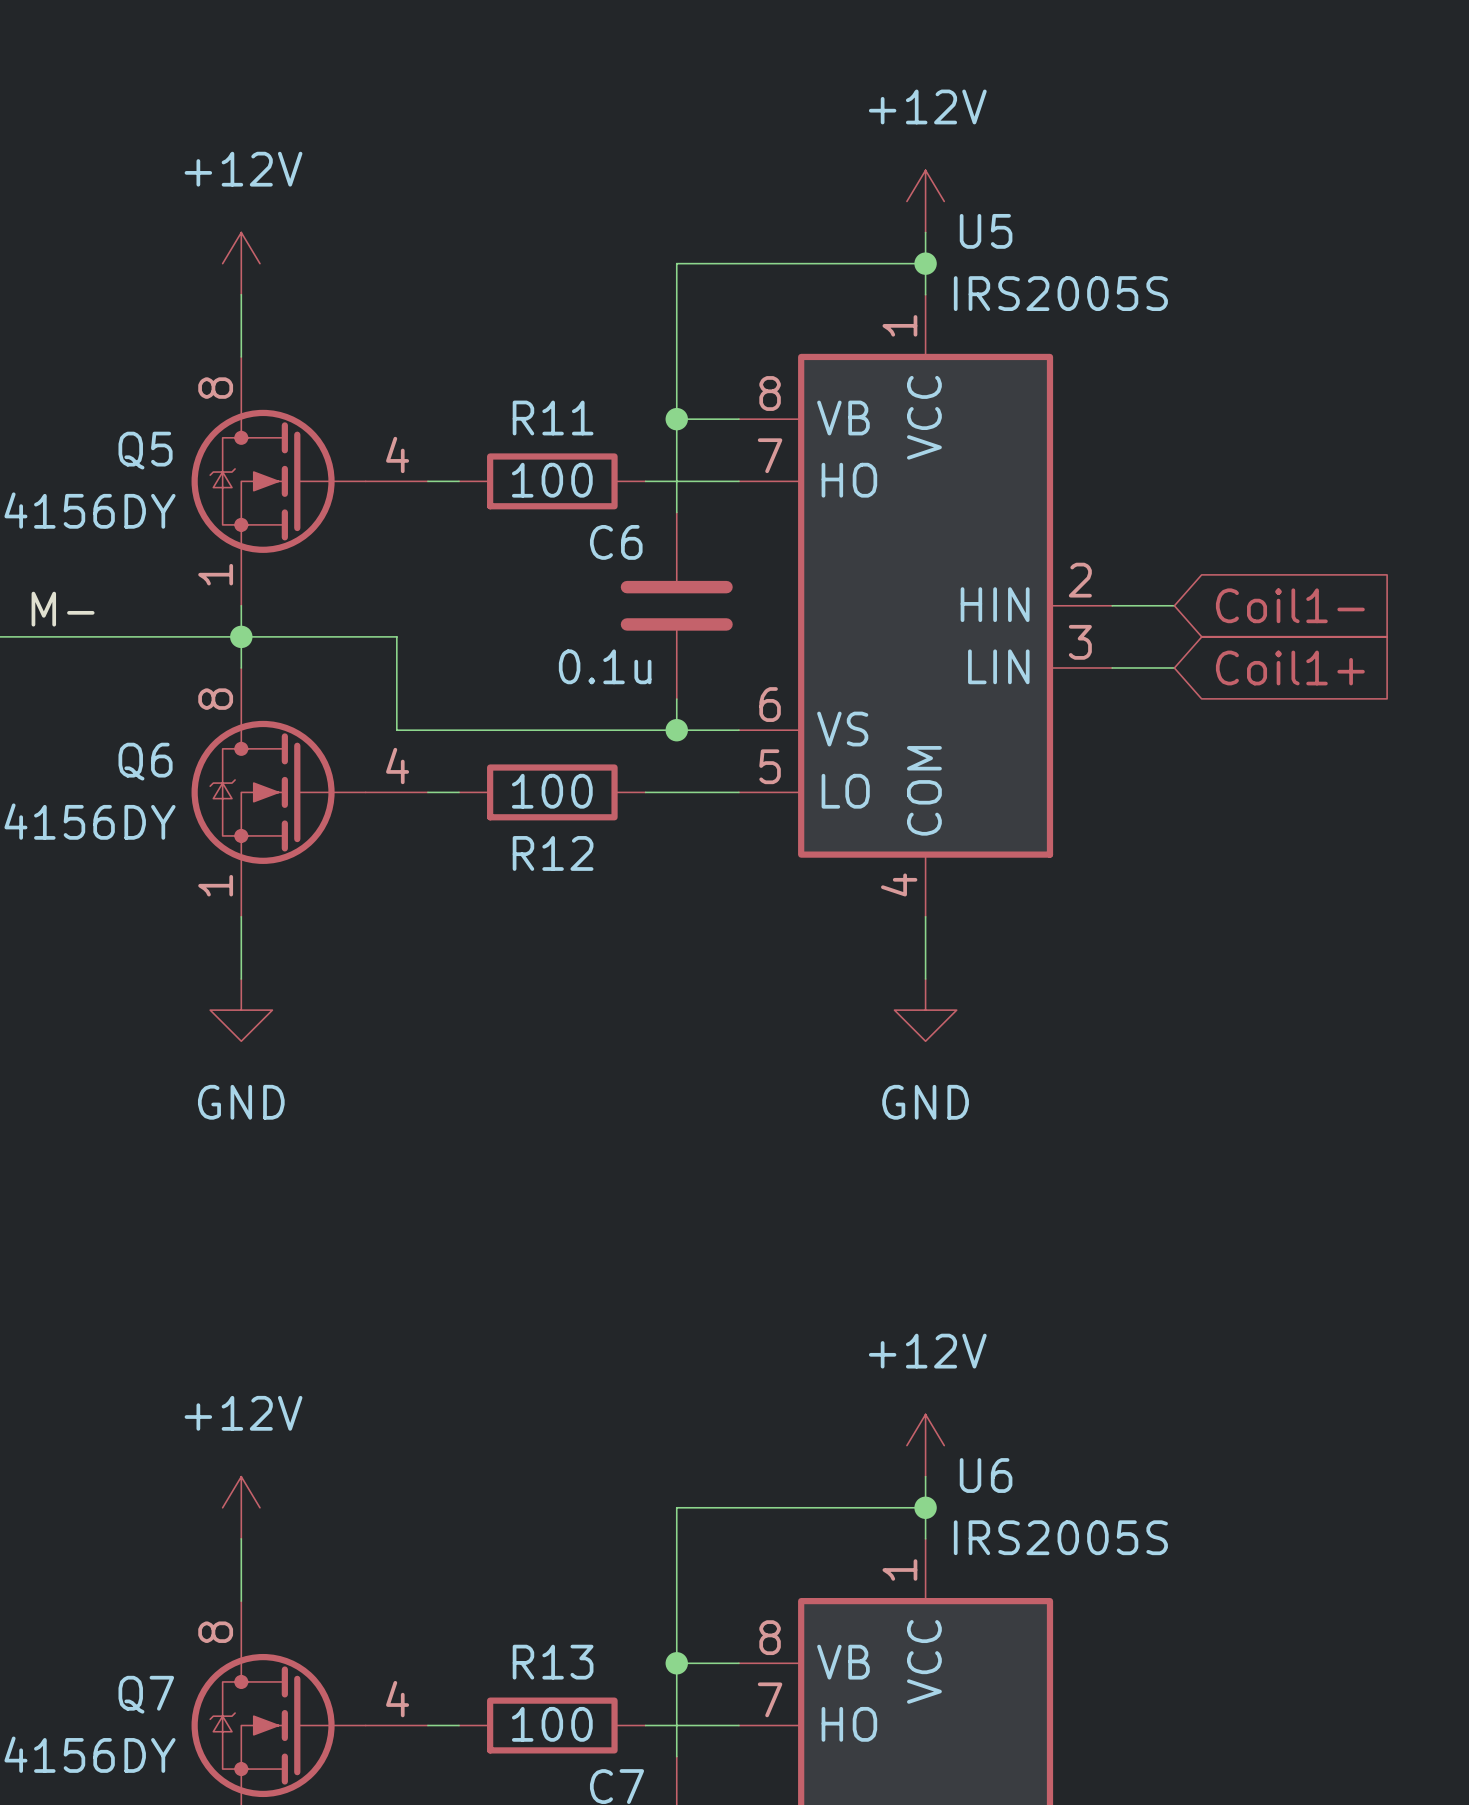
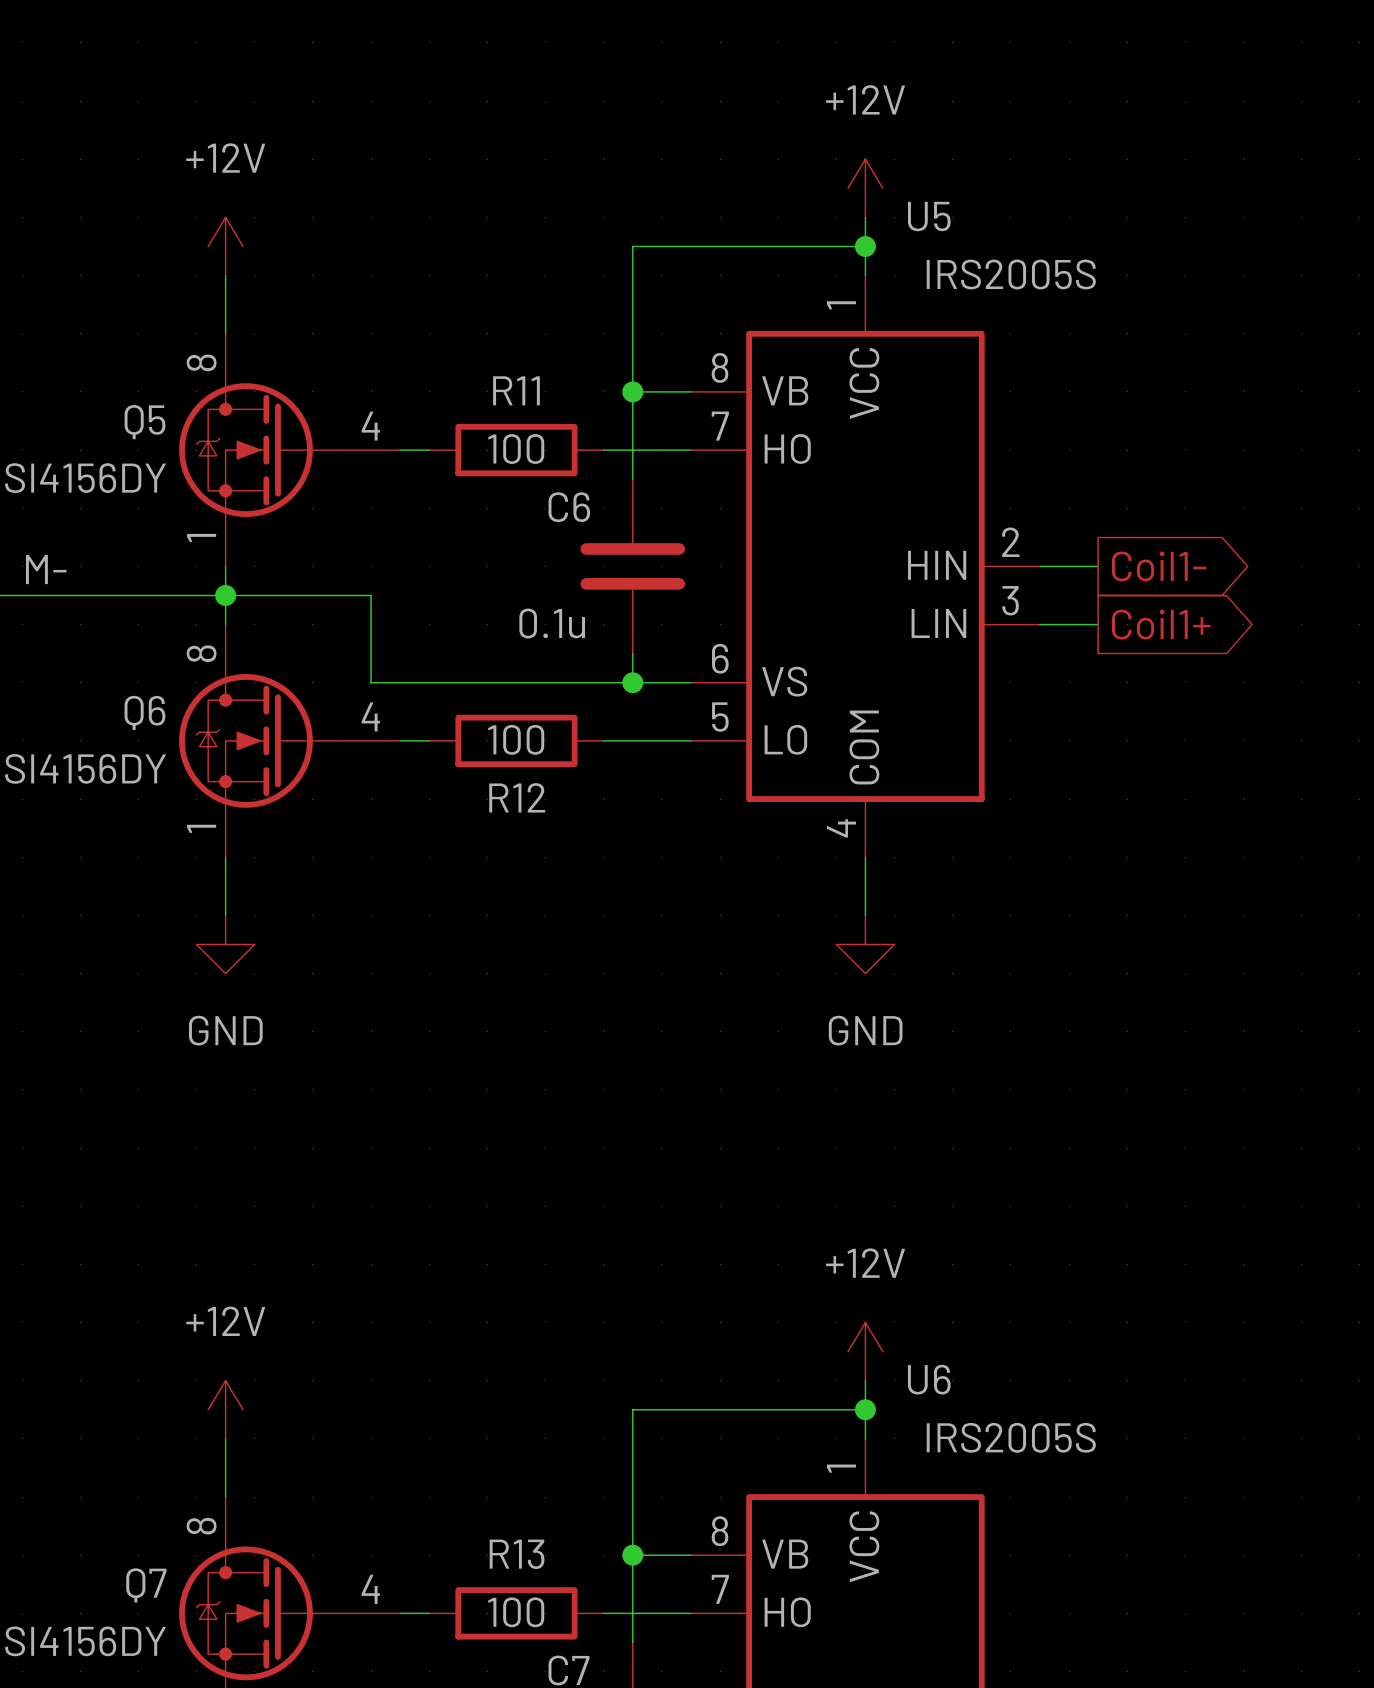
global label shape: input (1290, 605) -> output (1159, 566)
global label shape: input (1290, 667) -> output (1161, 624)

